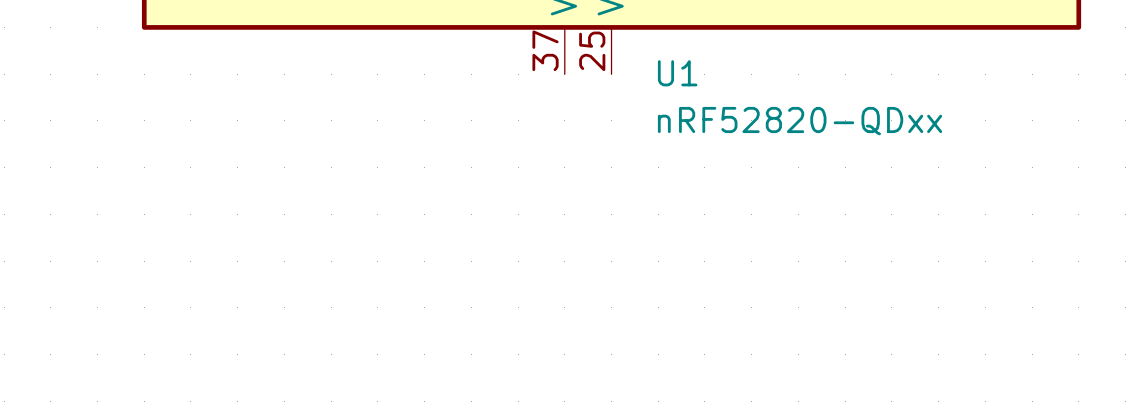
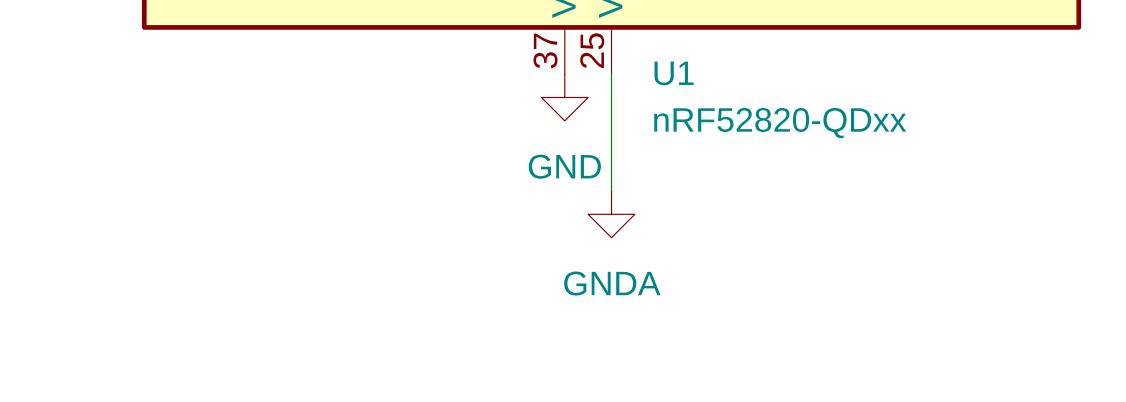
wire: none -> (611, 74) (611, 190)
power symbol: none -> GND (564, 97)
power symbol: none -> GNDA (611, 214)

